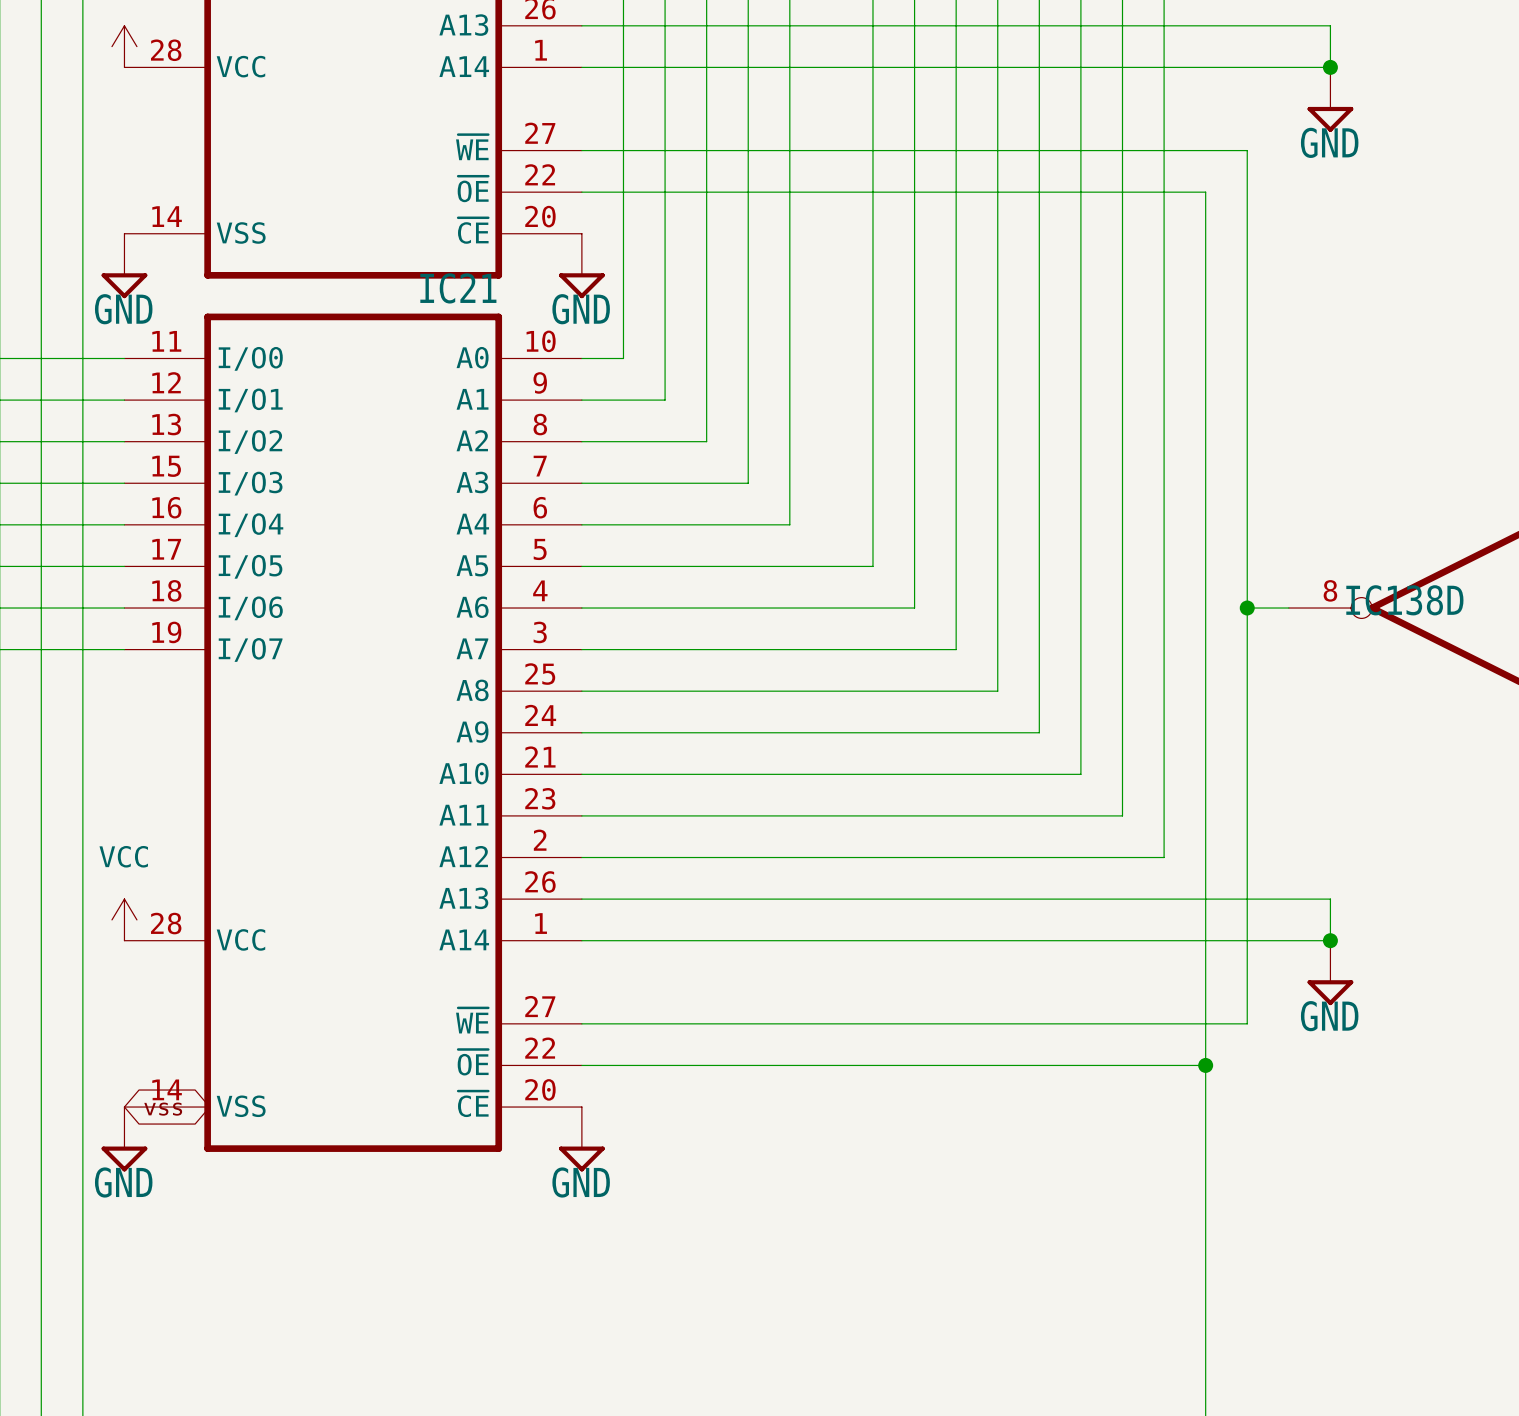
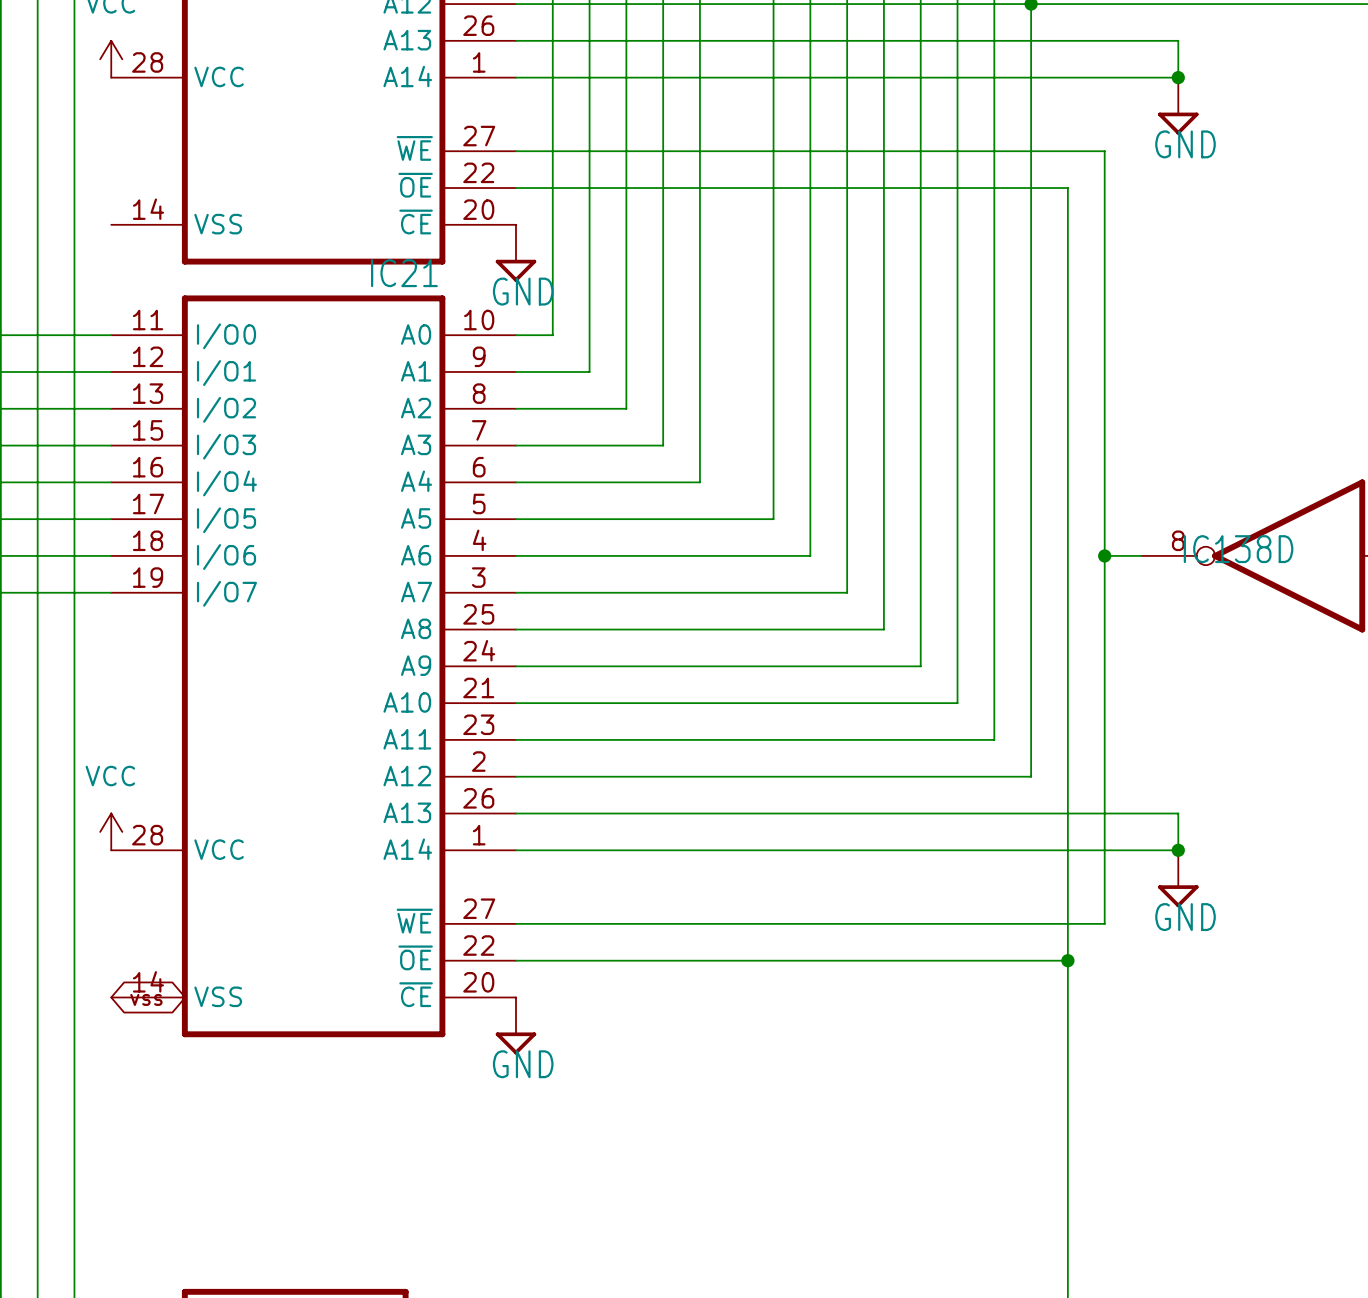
power symbol: GND (124, 265) -> none
power symbol: GND (124, 1139) -> none

